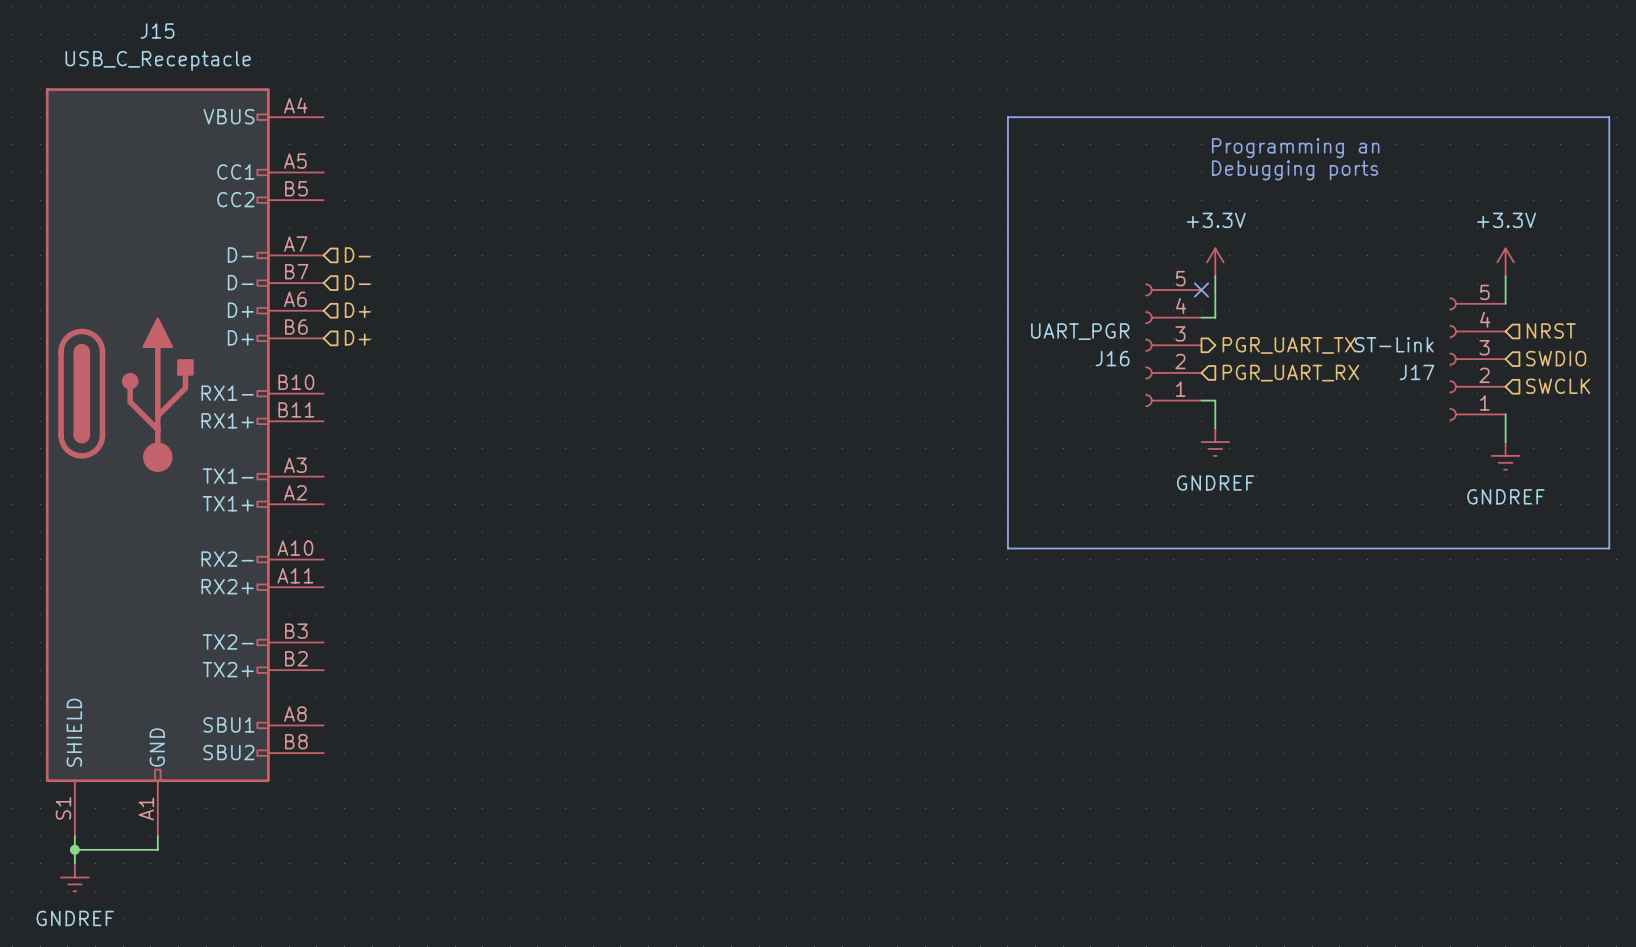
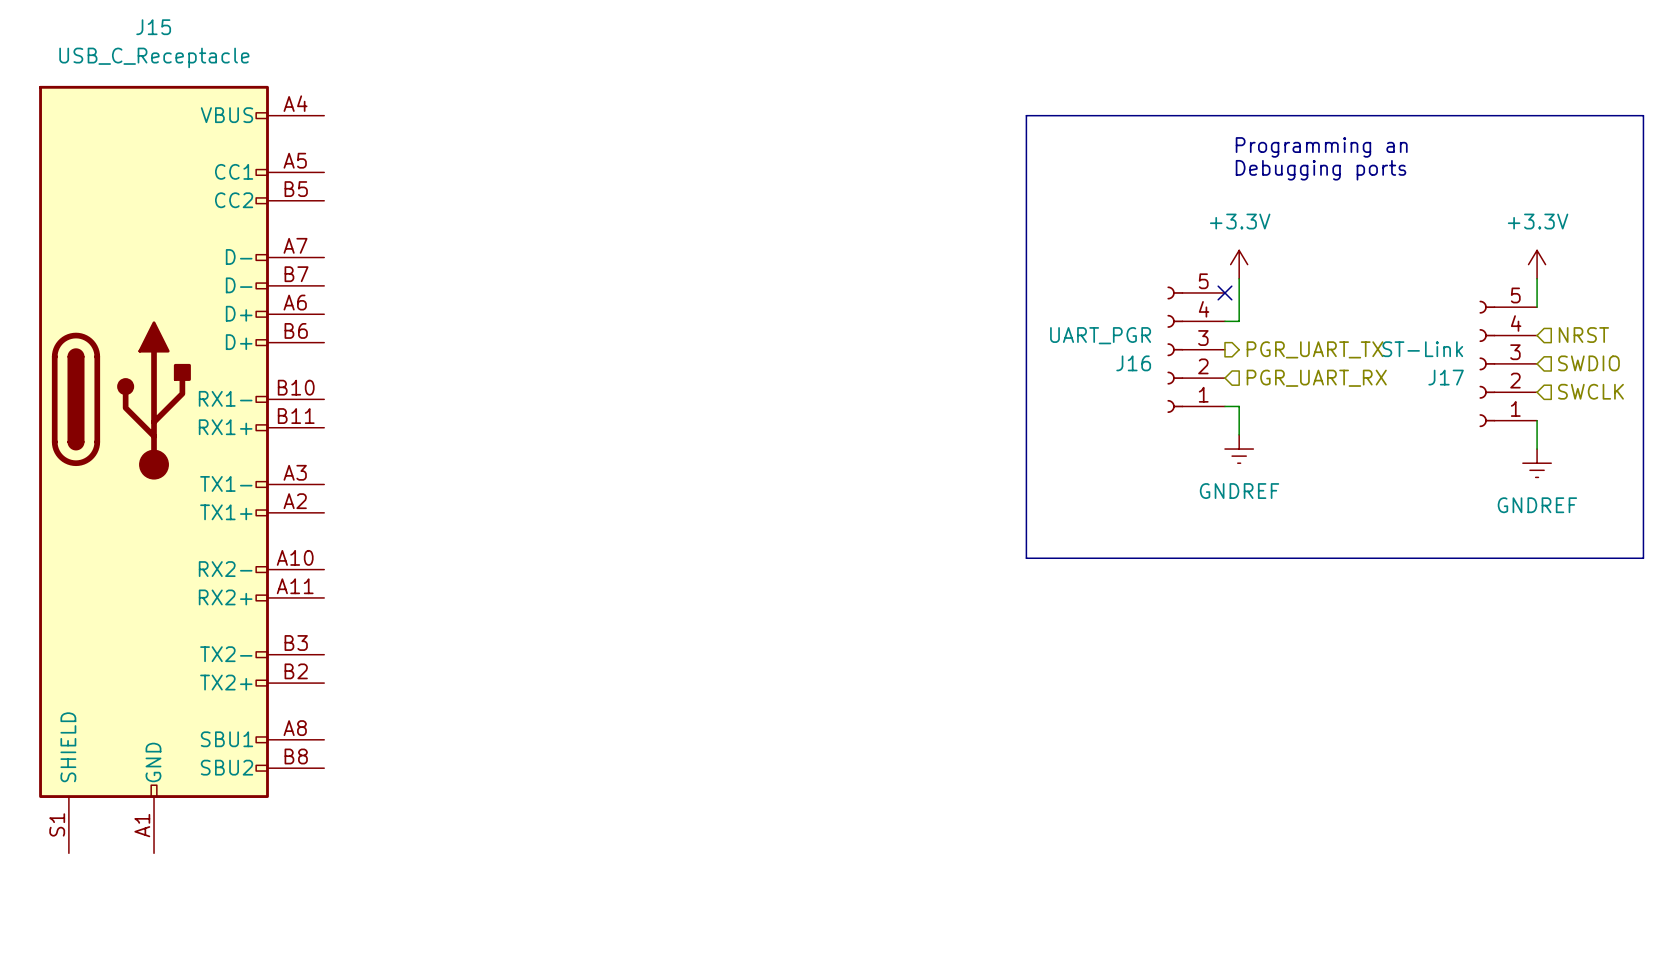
hierarchical label: D- (357, 254) -> none
hierarchical label: D- (357, 282) -> none
hierarchical label: D+ (357, 310) -> none
hierarchical label: D+ (357, 337) -> none
wire: (74, 836) (74, 863) -> none
wire: (157, 836) (157, 849) (74, 849) -> none
junction: (74, 849) -> none
power symbol: GNDREF (74, 877) -> none

